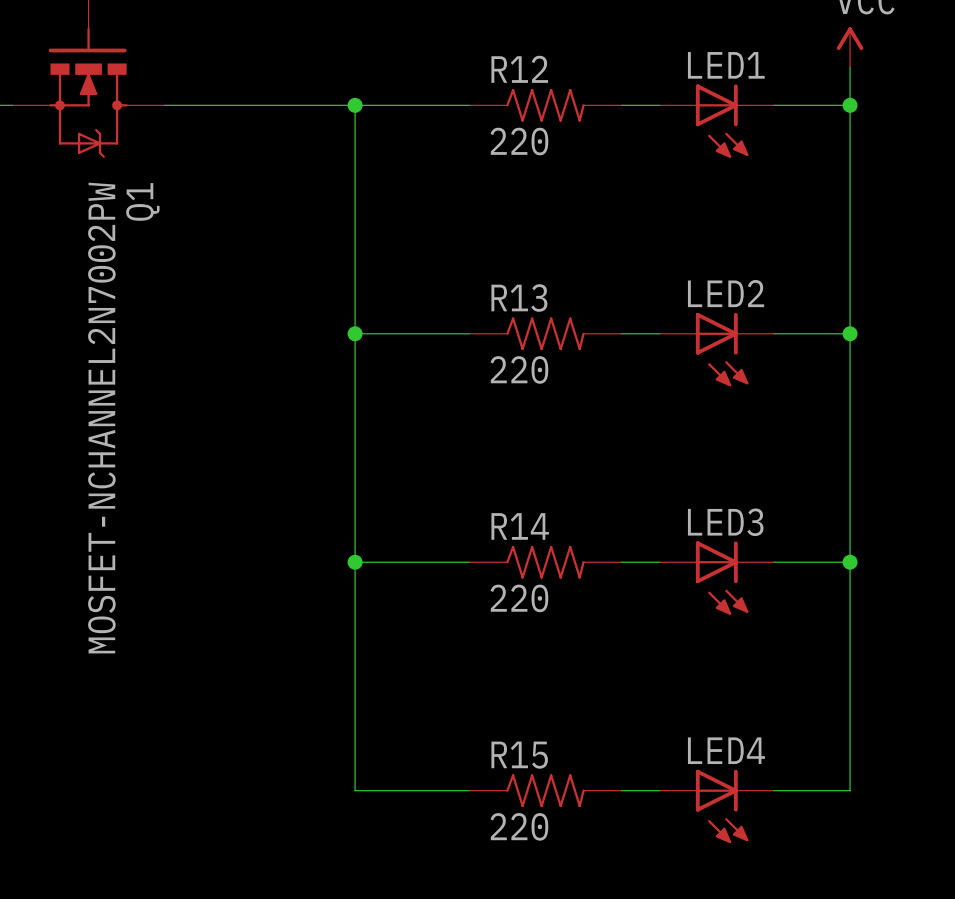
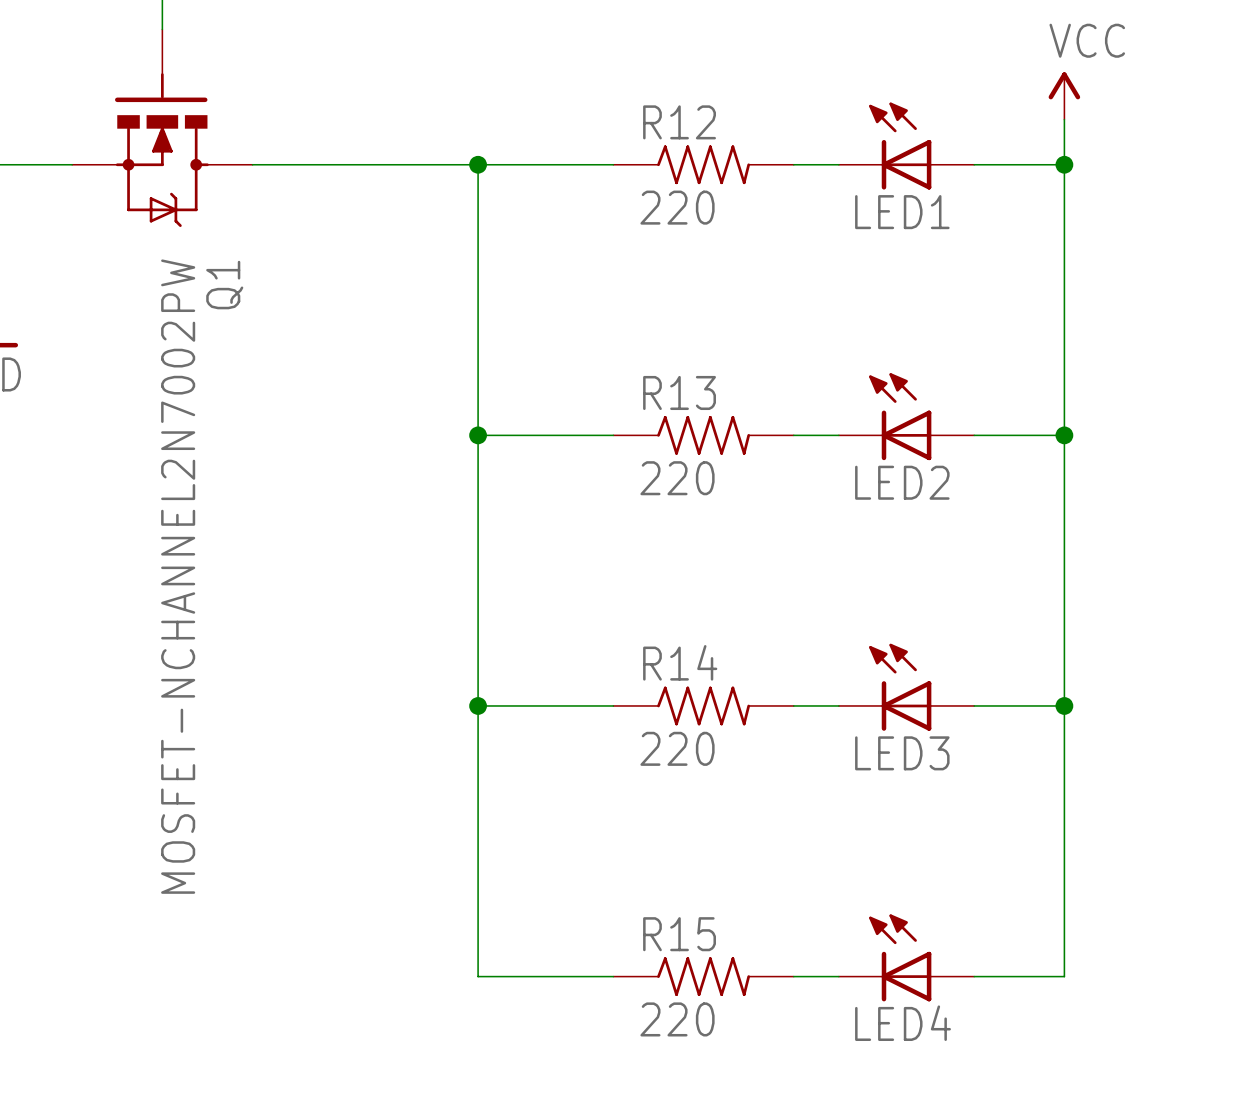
LED1 rotation: 0° (722, 121) -> 180° (900, 146)
LED2 rotation: 0° (722, 349) -> 180° (900, 416)
LED3 rotation: 0° (722, 578) -> 180° (900, 687)
LED4 rotation: 0° (722, 806) -> 180° (900, 957)

